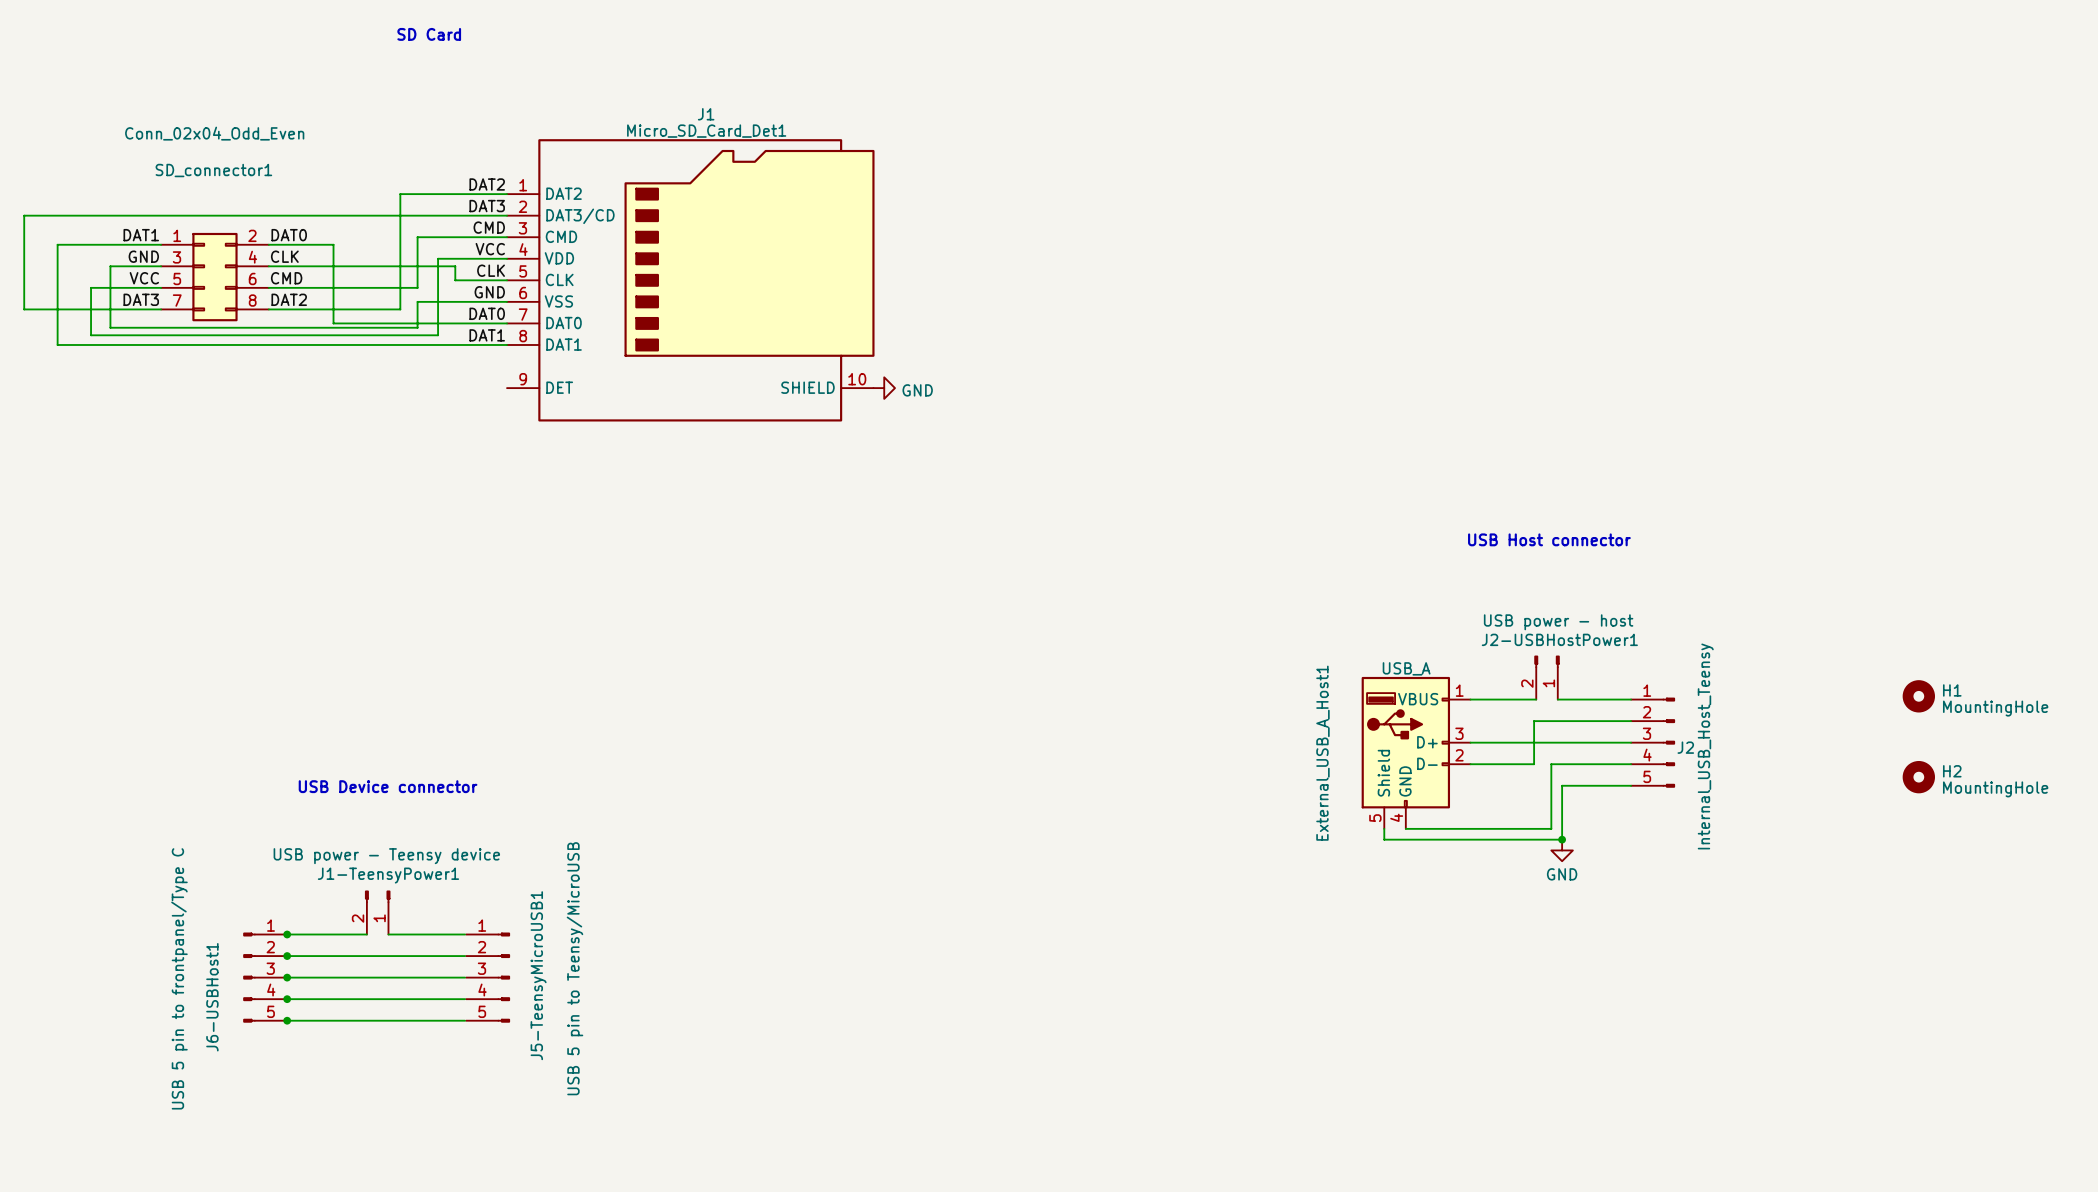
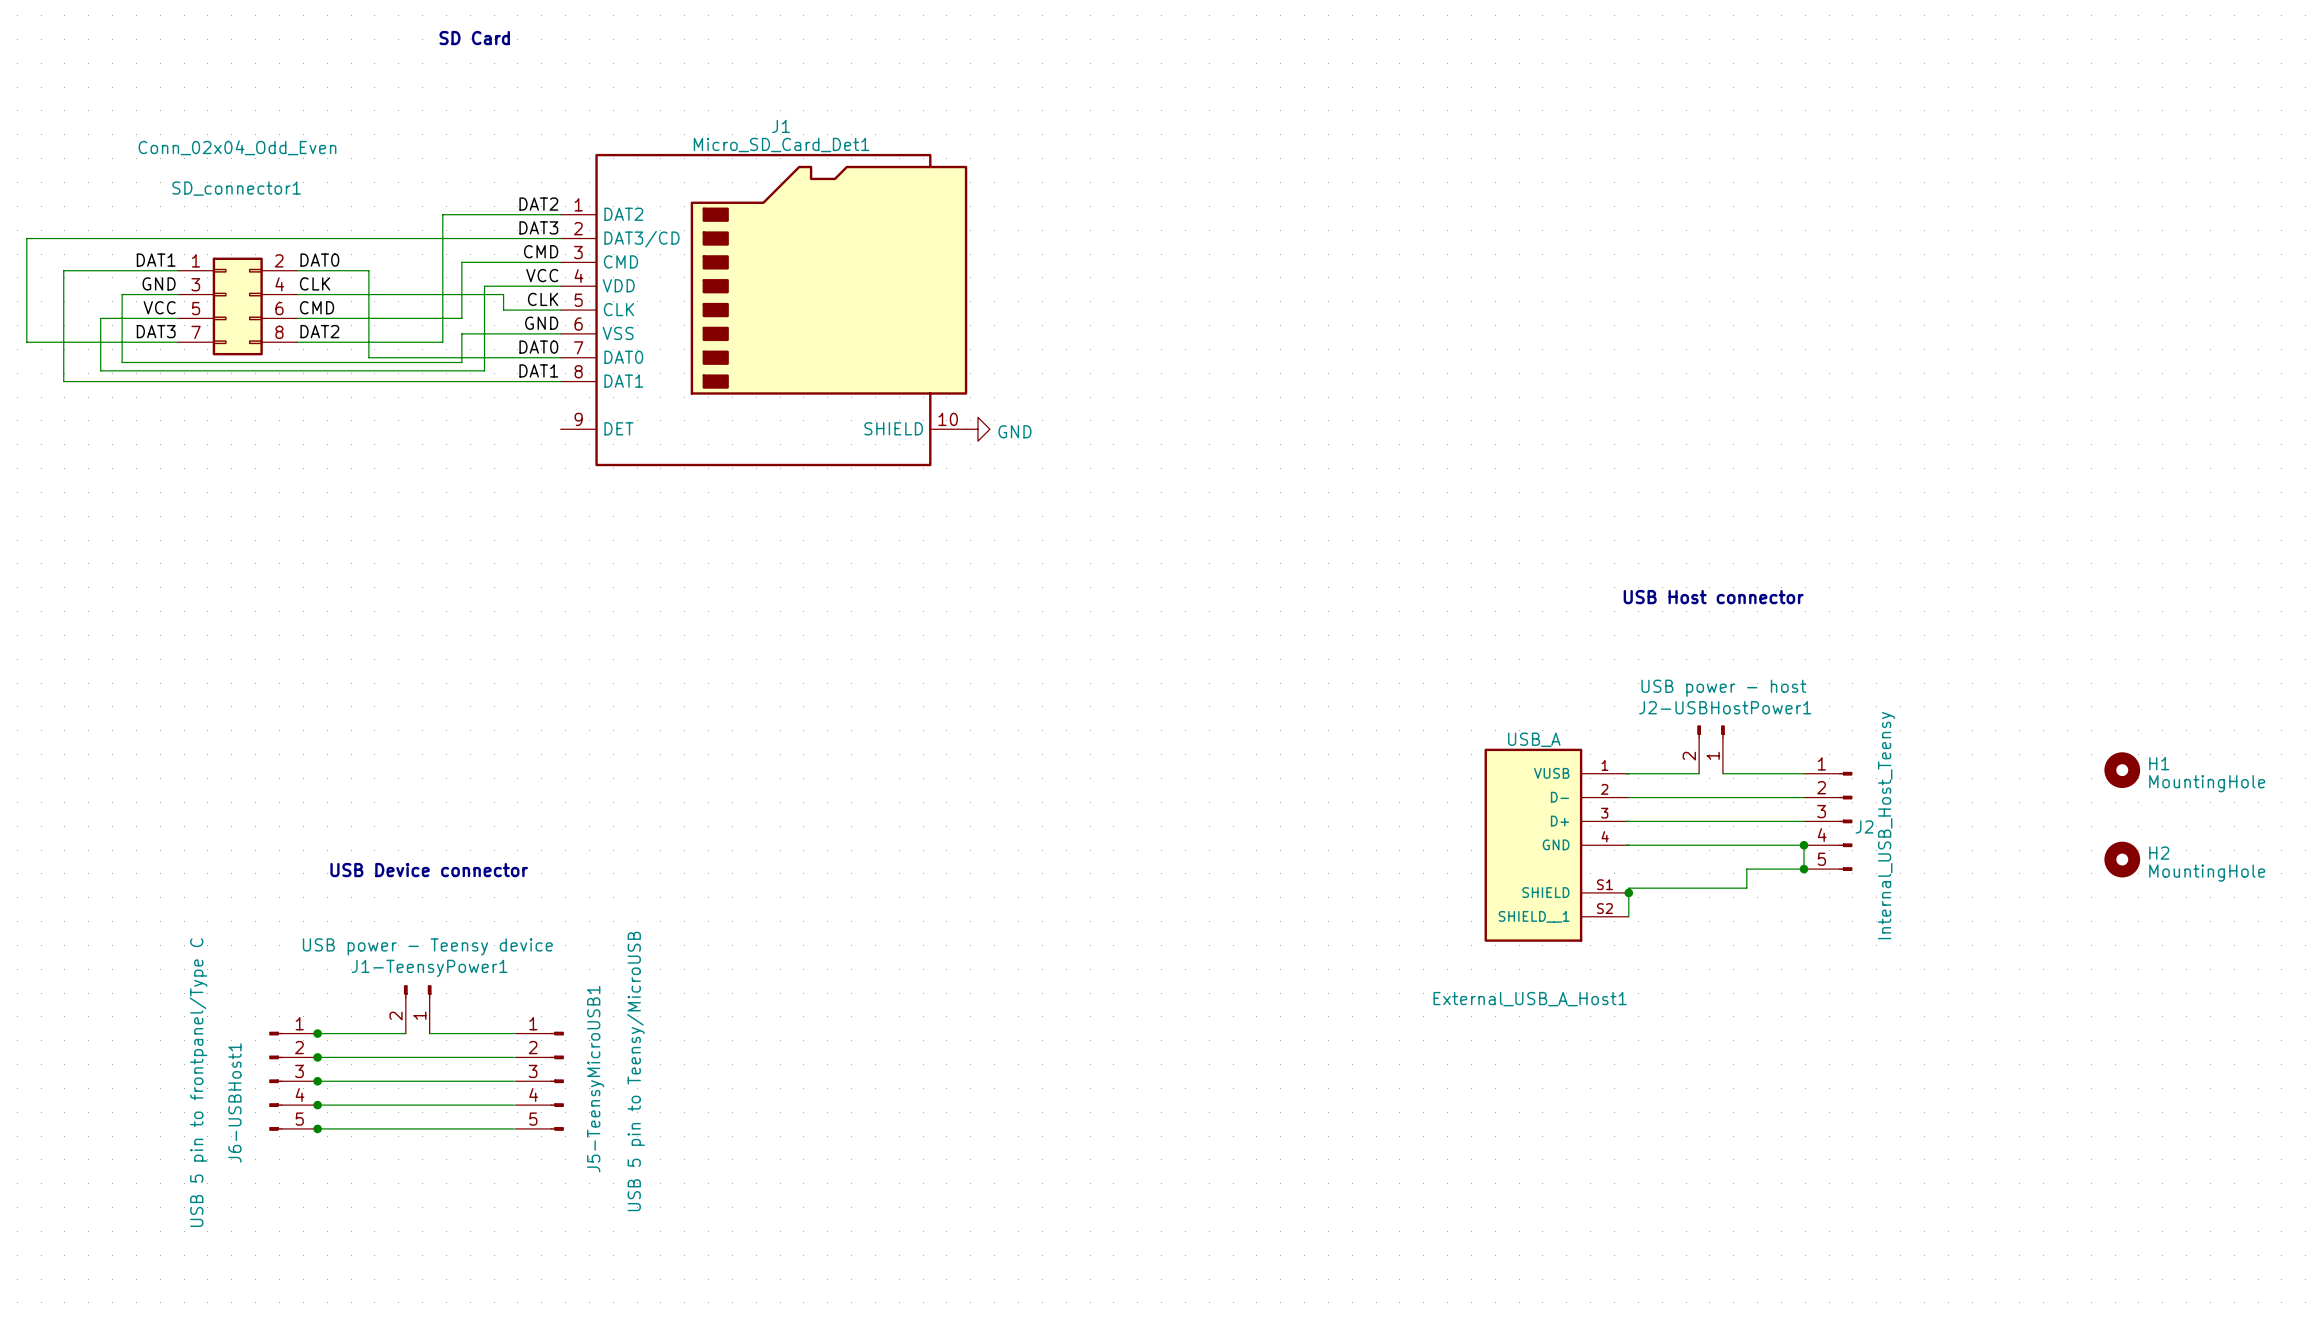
External_USB_A_Host1 symbol: [1361, 676, 1471, 829] -> [1484, 748, 1629, 942]
wire: none -> (1628, 797) (1696, 797)
wire: (1534, 721) (1534, 764) -> (1715, 845) (1696, 845)
External_USB_A_Host1 name position: External_USB_A_Host1 (1322, 753) -> External_USB_A_Host1 (1530, 999)
wire: (1551, 764) (1551, 828) (1405, 828) -> none
wire: none -> (1804, 845) (1804, 869)
junction: none -> (1804, 845)
wire: (1579, 785) (1562, 785) (1562, 839) (1384, 839) (1384, 828) -> (1746, 869) (1746, 888) (1628, 888) (1628, 916)
junction: none -> (1804, 869)
junction: none -> (1628, 892)
junction: (1562, 839) -> none
power symbol: GND (1562, 850) -> none

